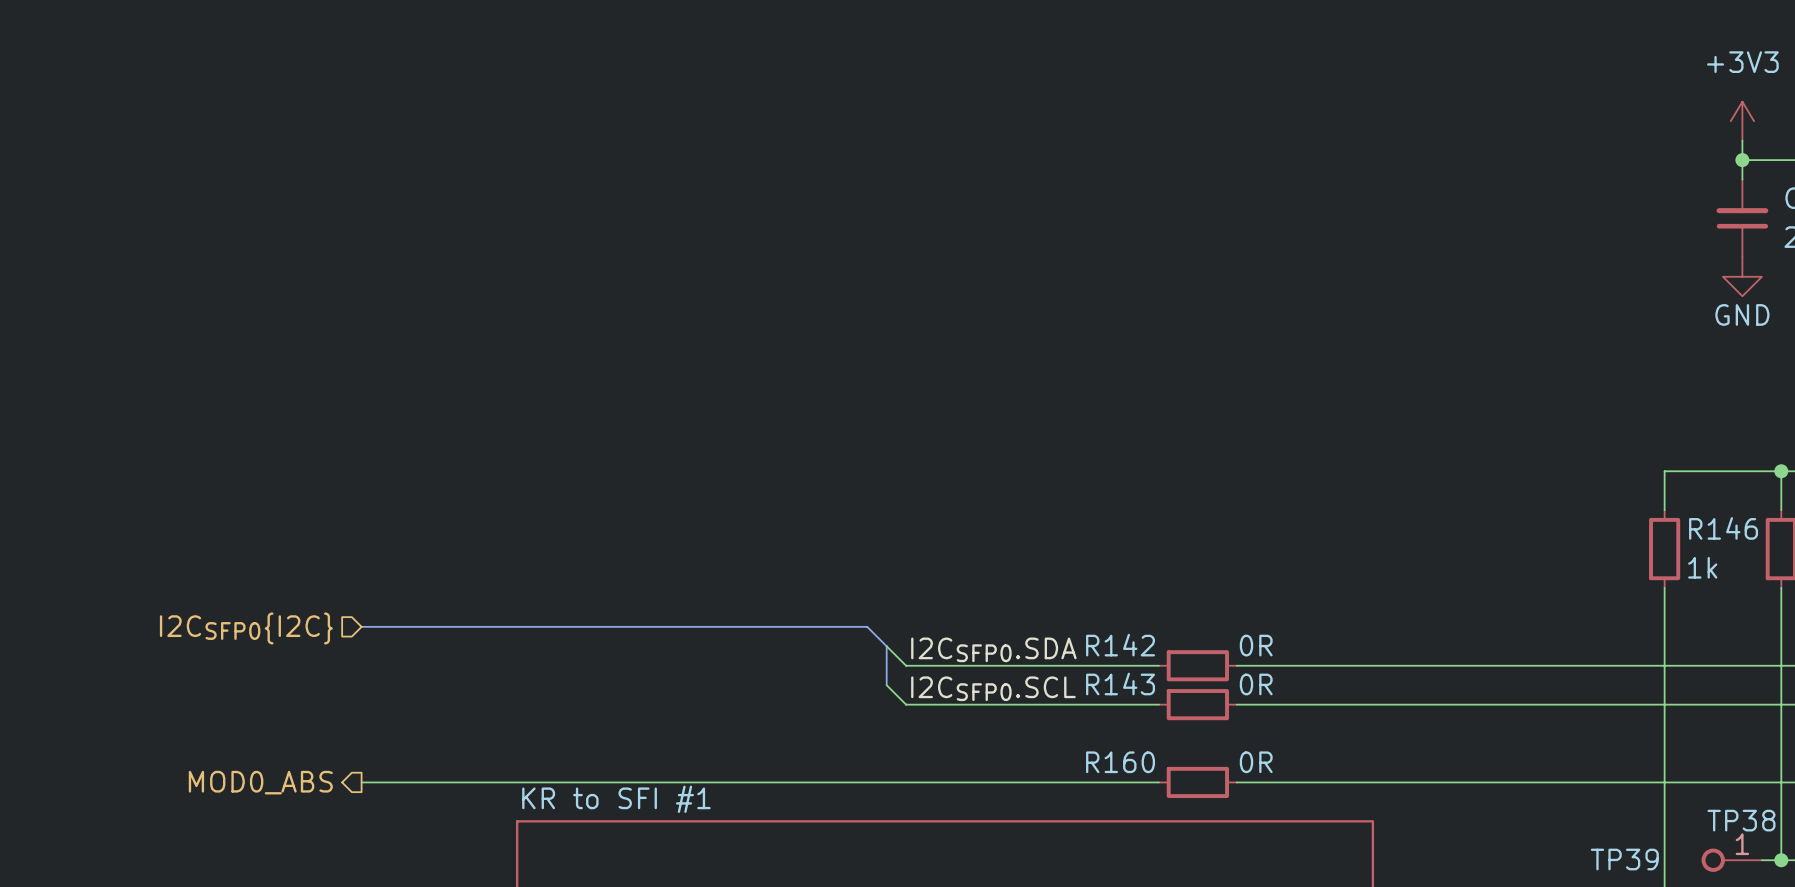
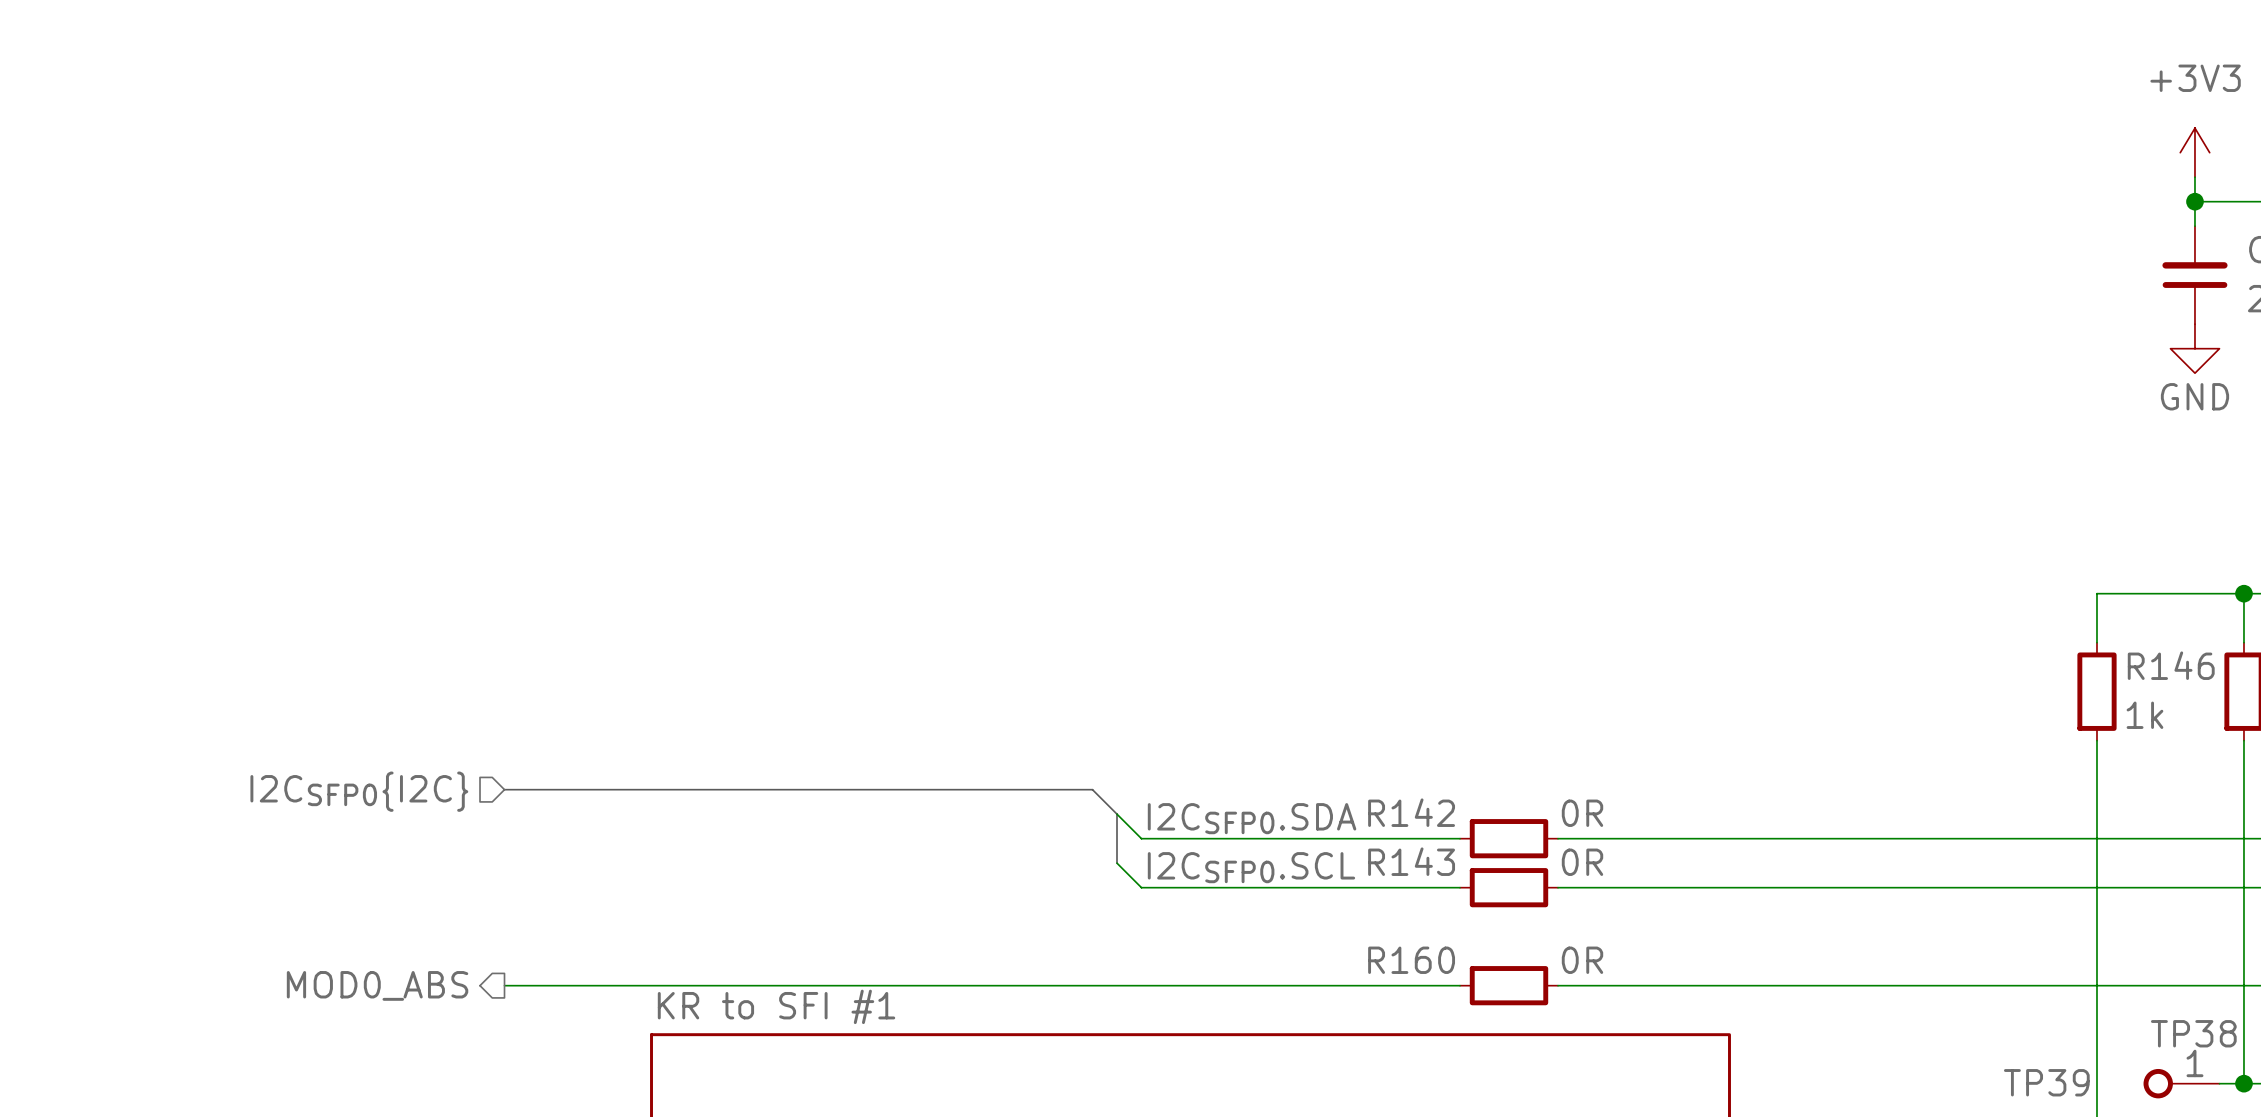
bus: (361, 626) (400, 626) -> none
hierarchical label position: I2CSFP0{I2C} (246, 628) -> I2CSFP0{I2C} (359, 791)
hierarchical label position: MOD0_ABS (260, 782) -> MOD0_ABS (377, 985)
wire: (361, 782) (400, 782) -> none

